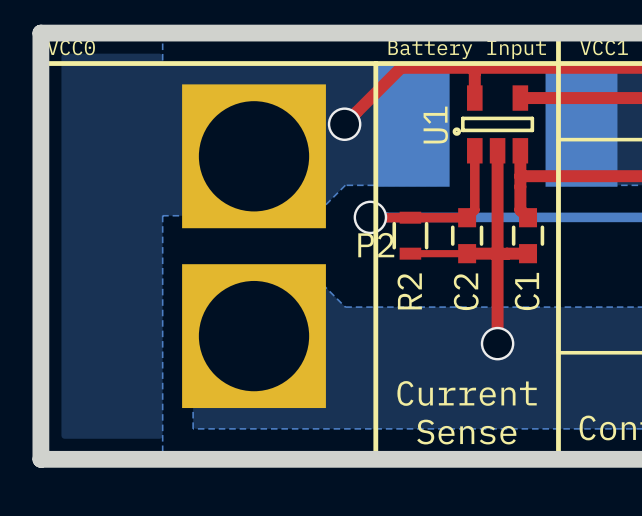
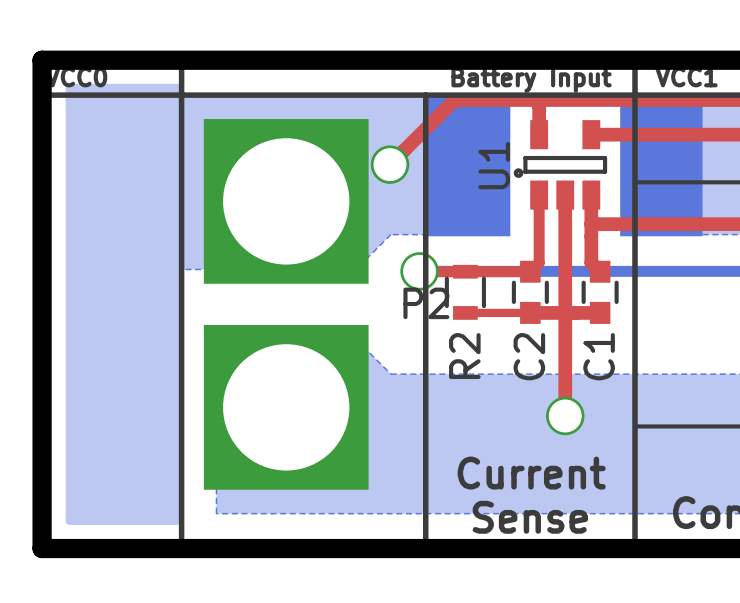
line: none -> (181, 60) (181, 548)

